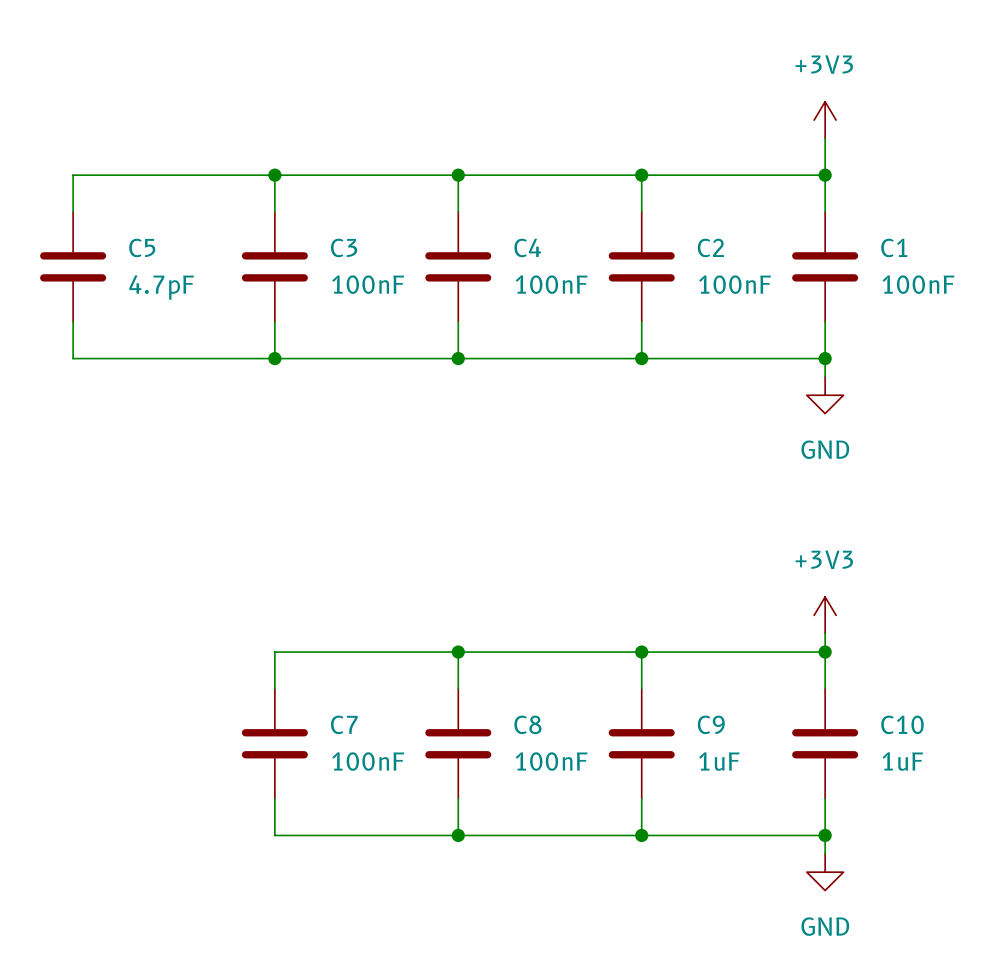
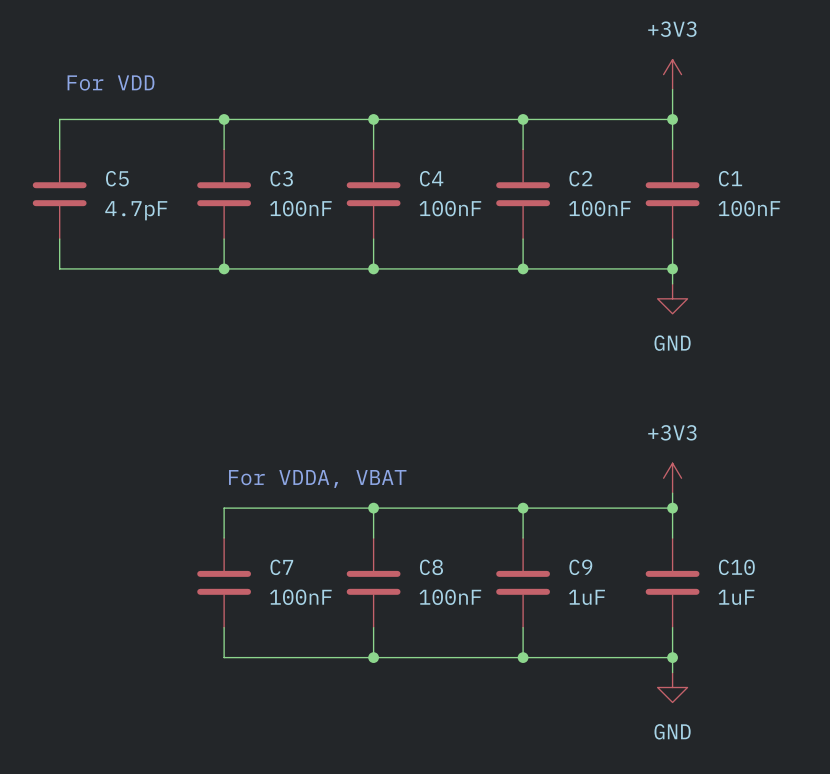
text: none -> For VDD (111, 82)
text: none -> For VDDA, VBAT (317, 478)

